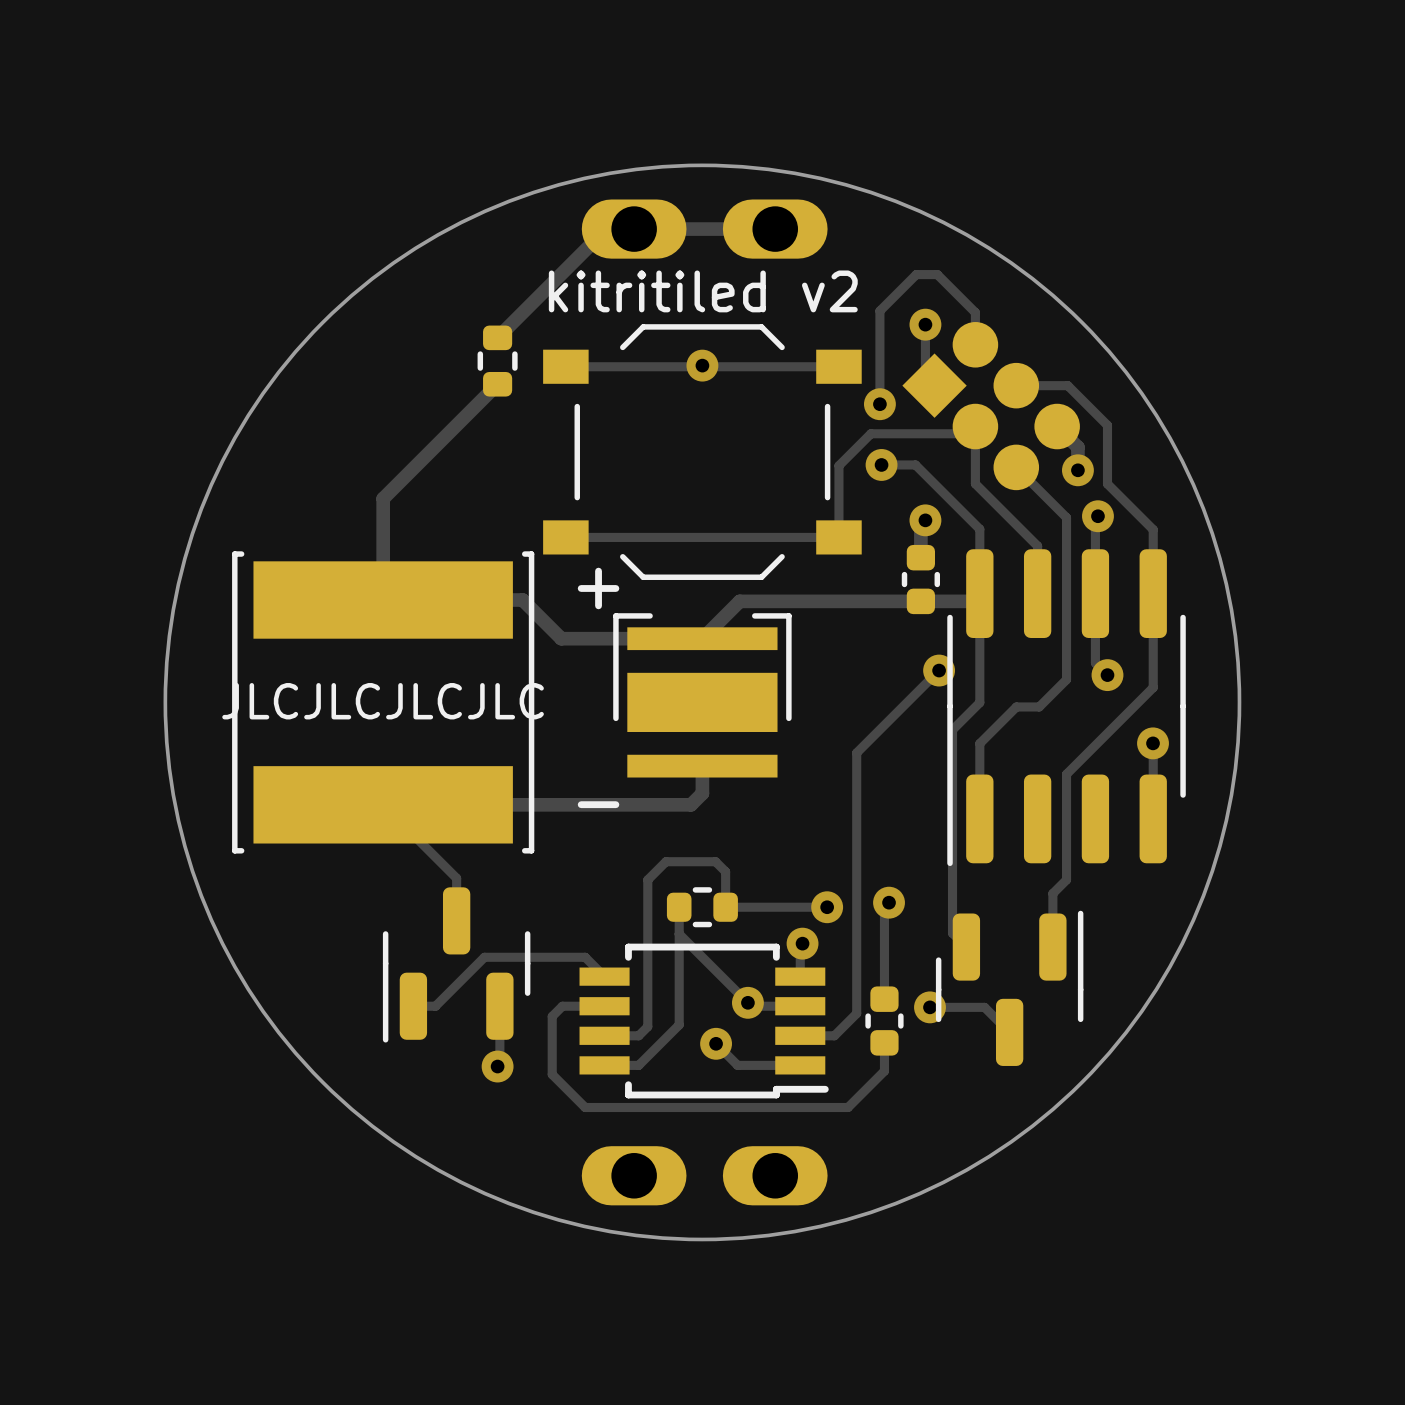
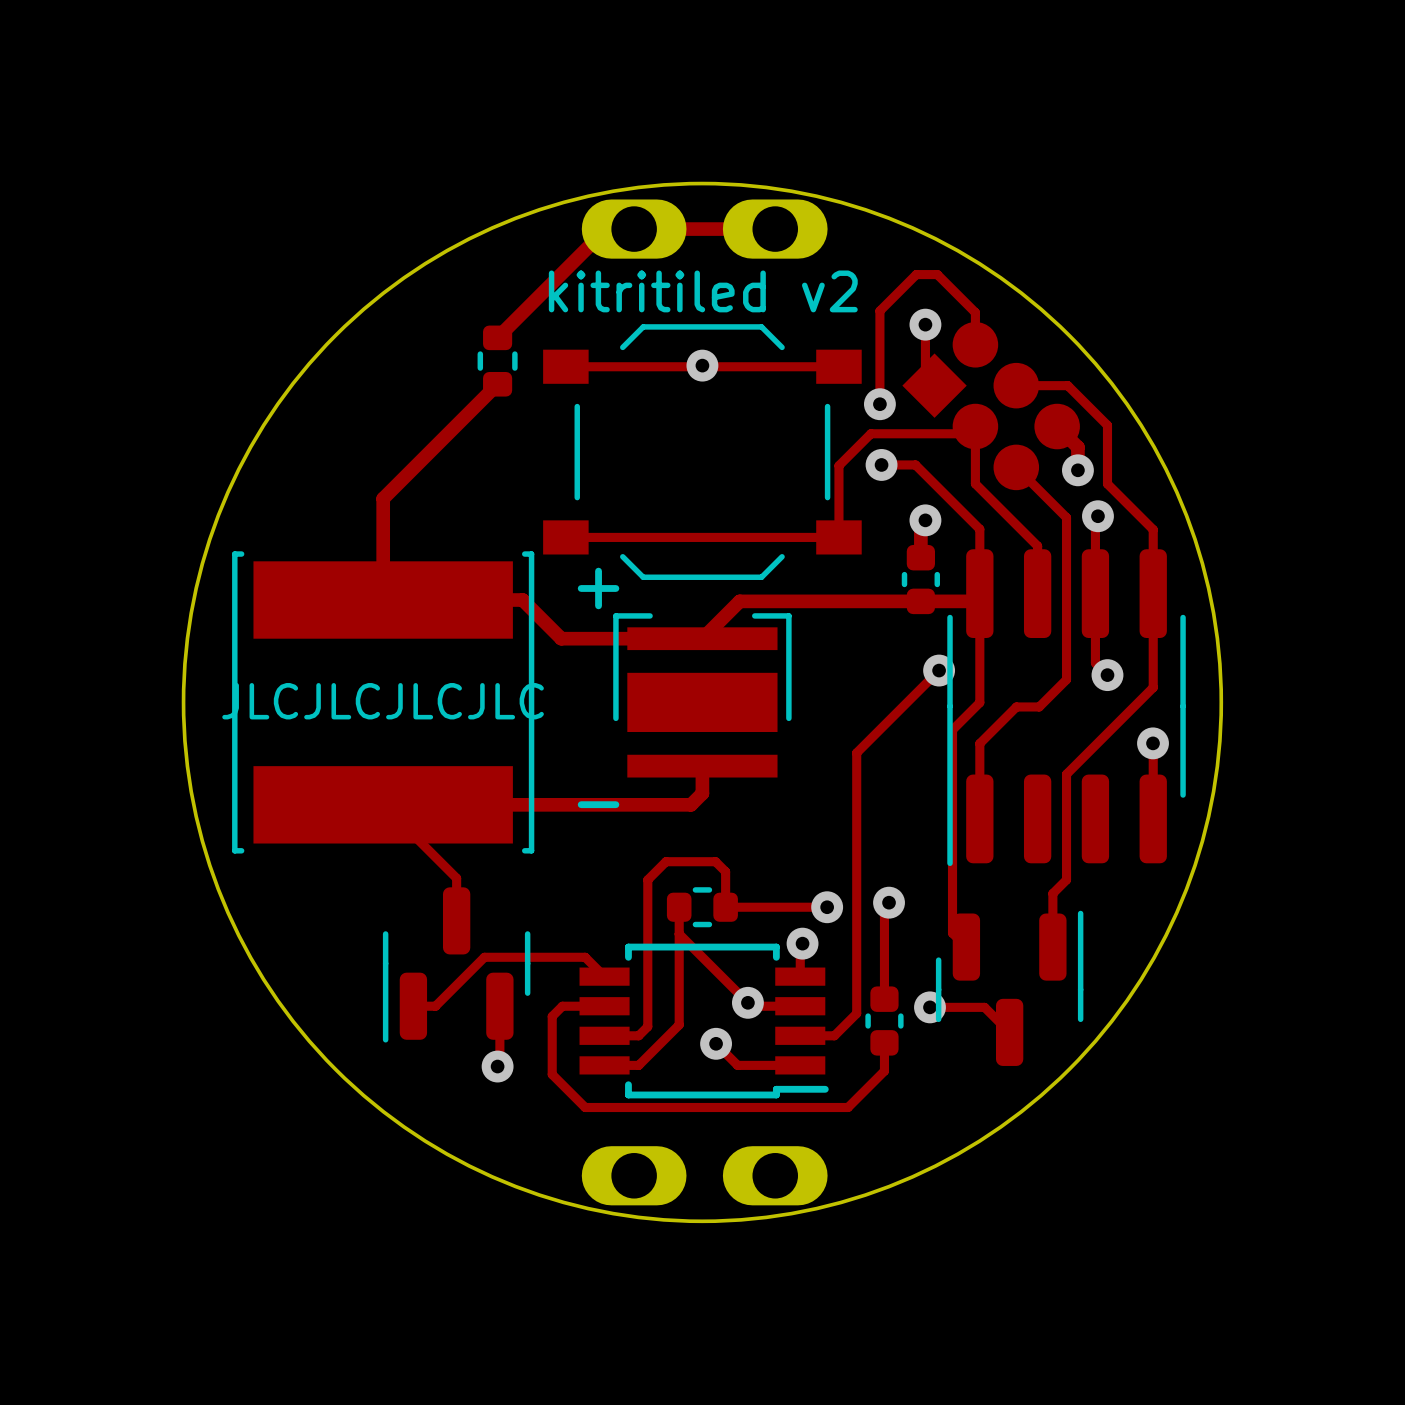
round board edge size: [163, 163, 1242, 1242] -> [181, 181, 1224, 1224]

